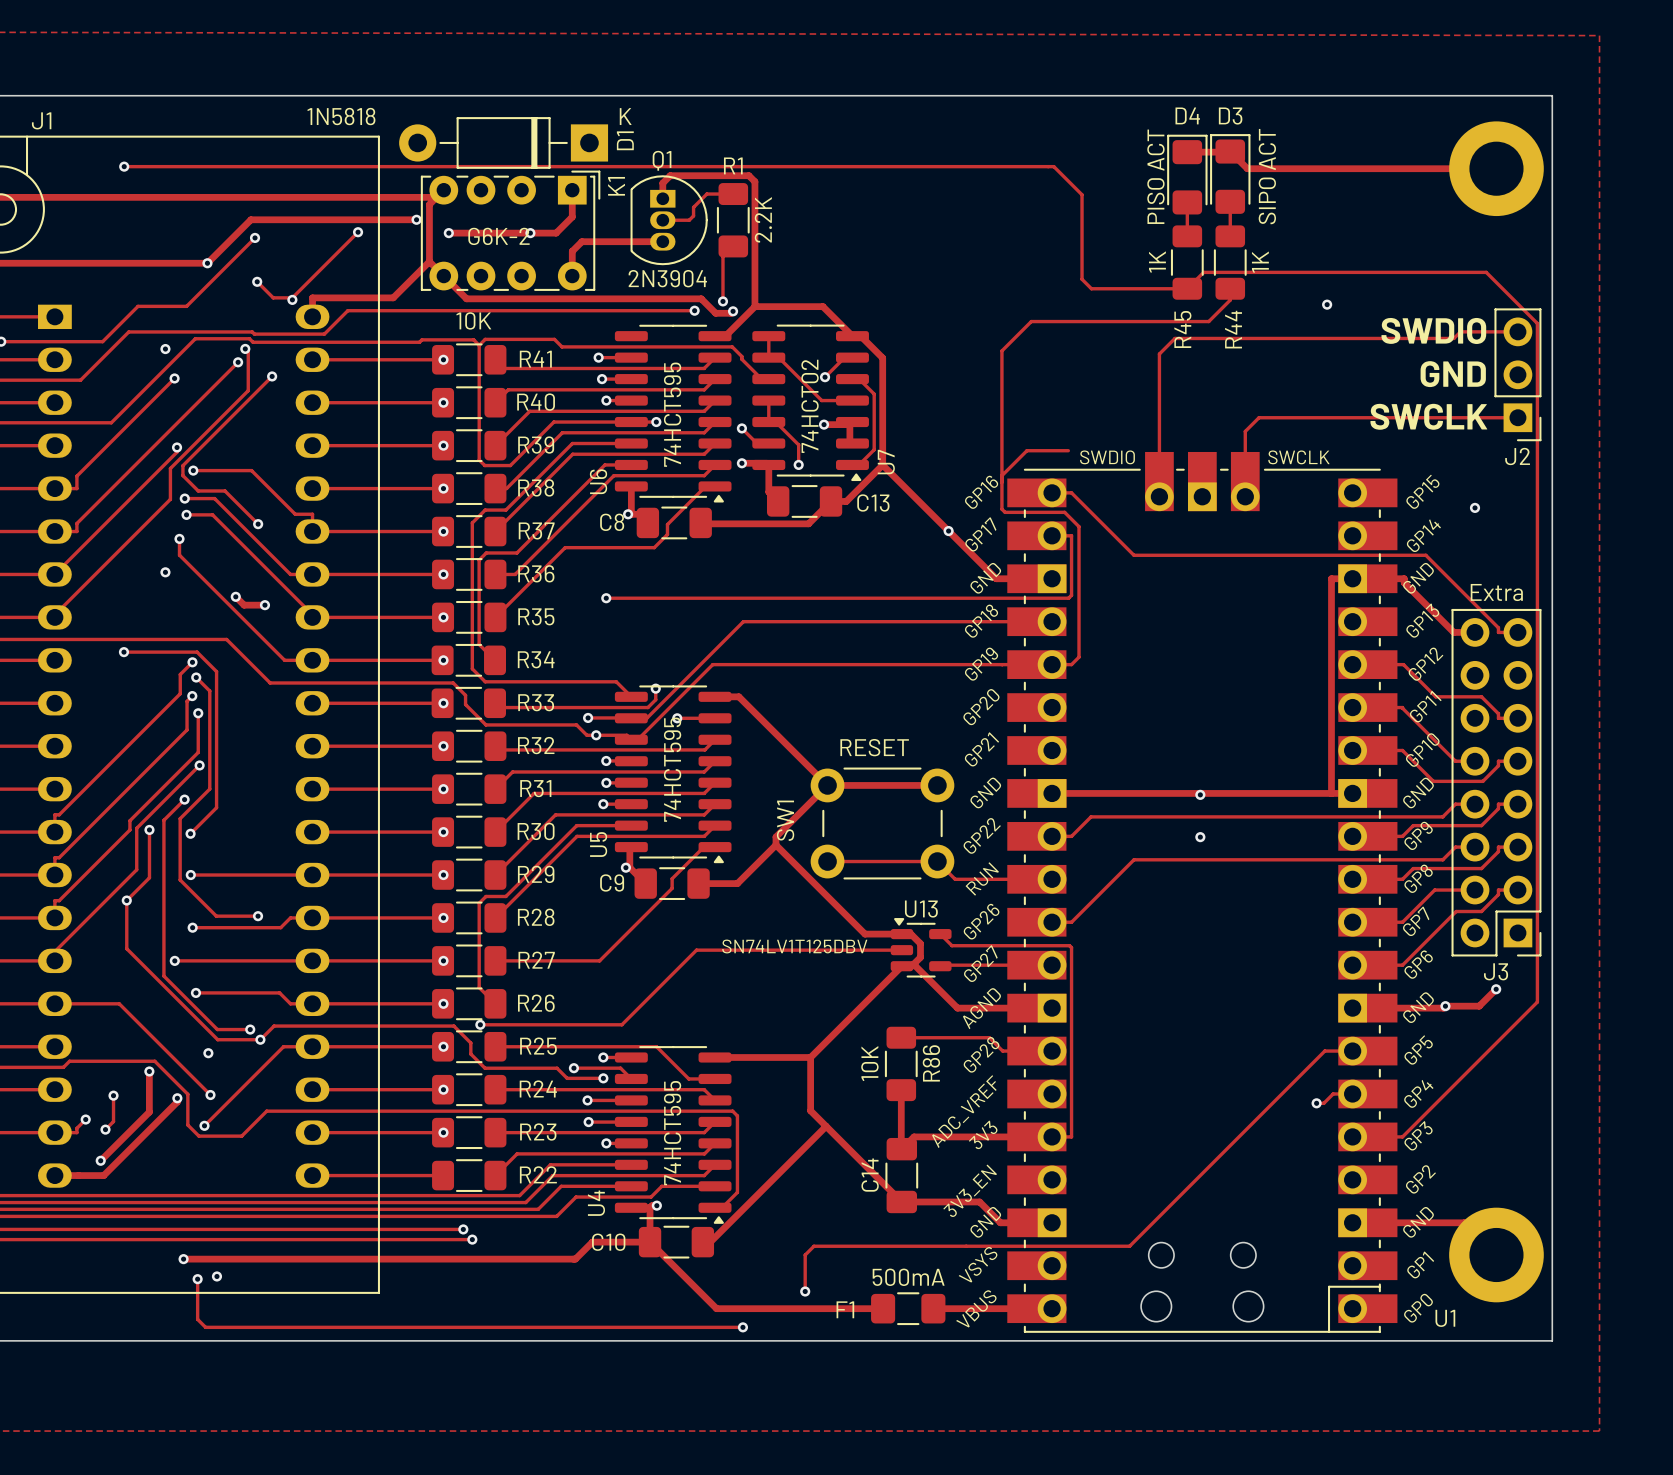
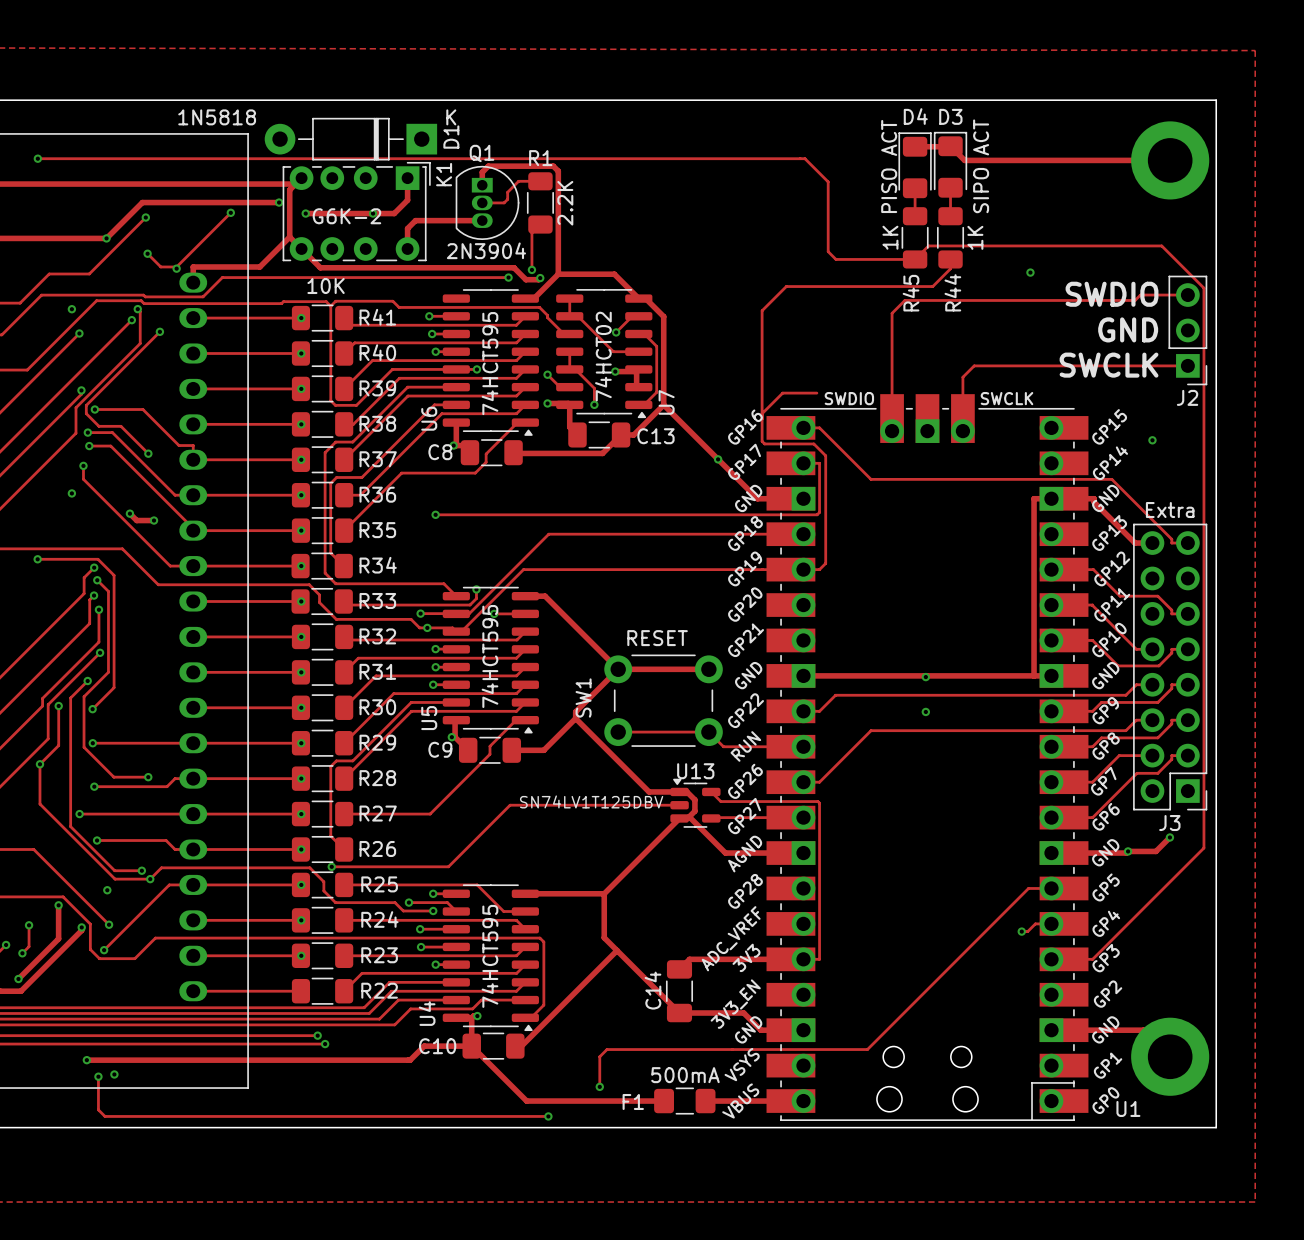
track: (901, 1037) (989, 1037) (1002, 1051) (1052, 1051) -> none
R86: 10K (901, 1063) -> none
track: (901, 1090) (901, 1149) -> none

